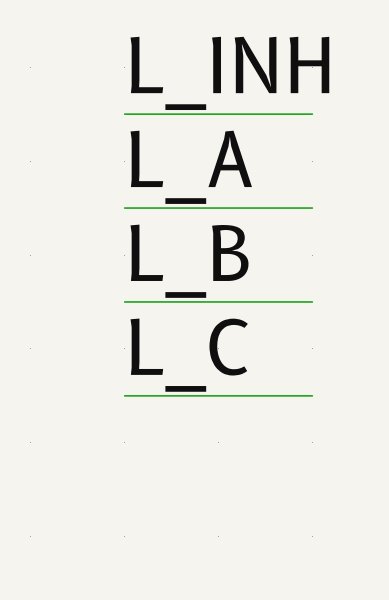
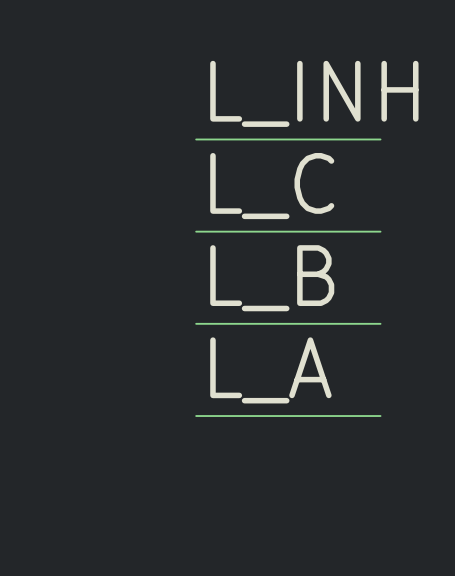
label: L_A (191, 167) -> L_C (272, 186)
label: L_C (189, 355) -> L_A (270, 370)

